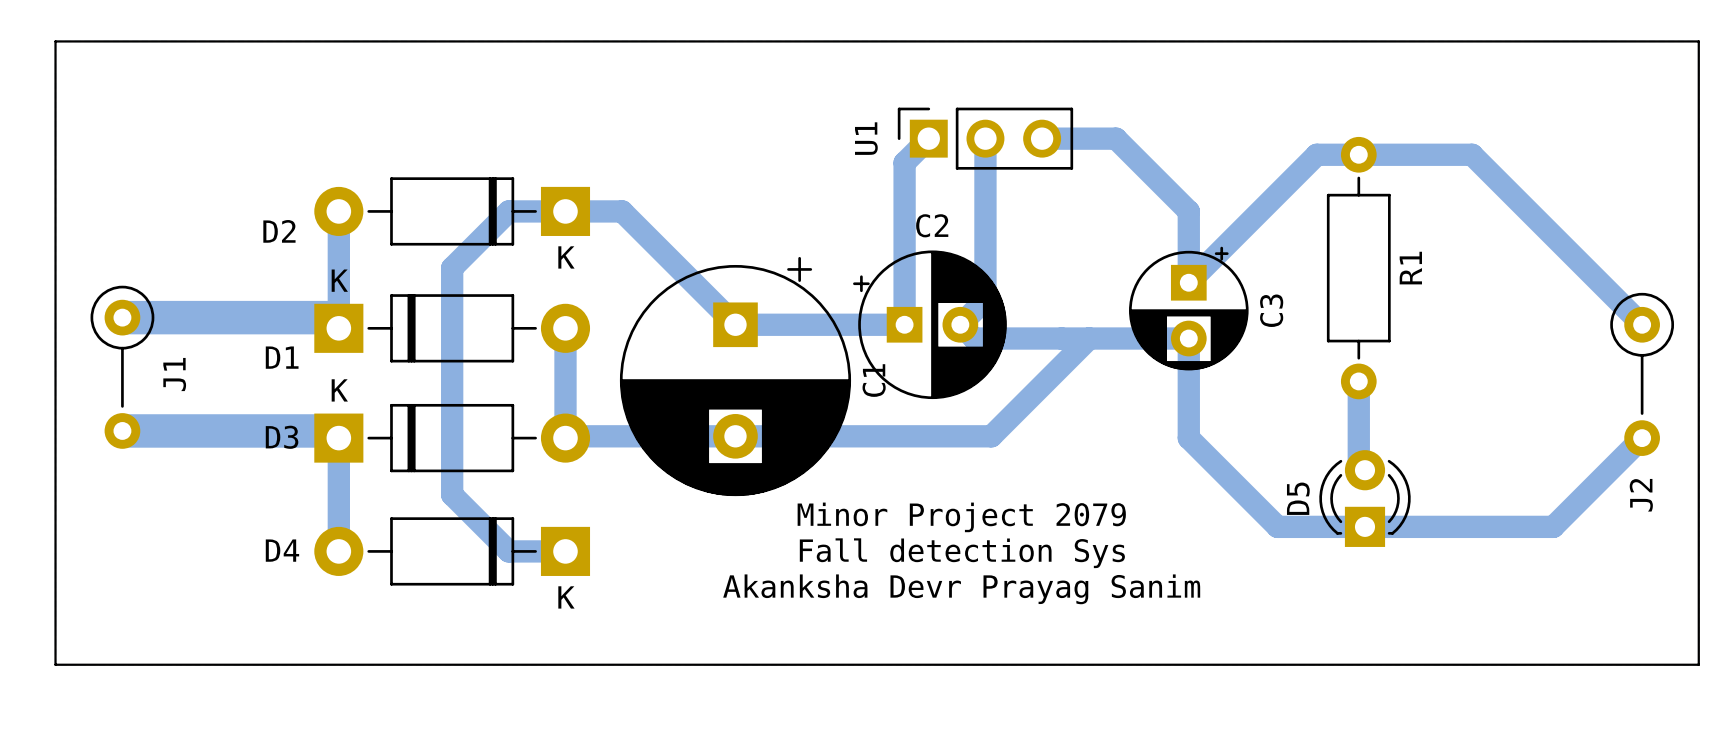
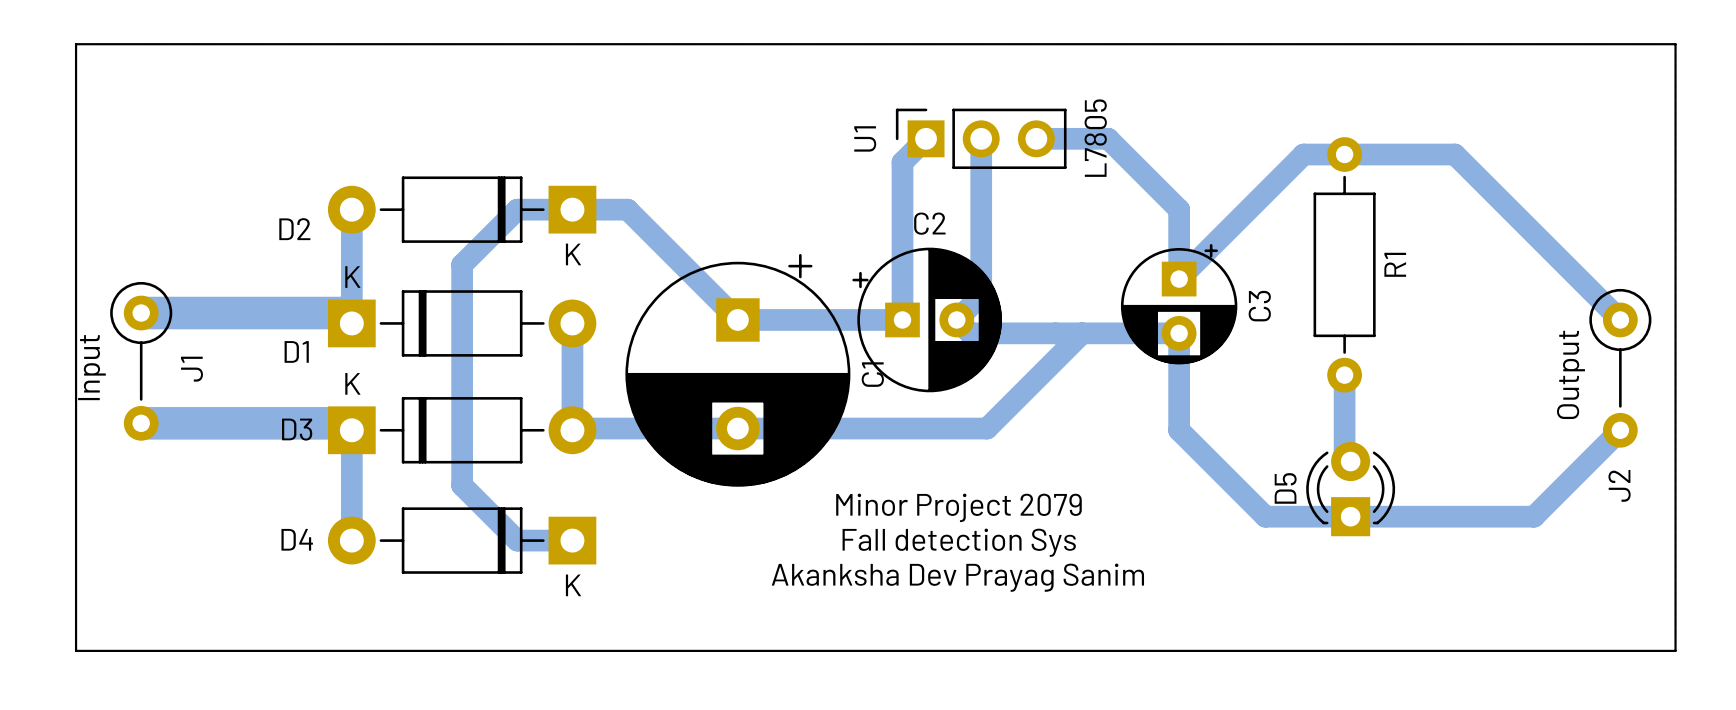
U1 value: none -> L7805 (1095, 138)
J1 value: none -> Input (91, 367)
J2 value: none -> Output (1570, 374)
text: Akanksha Devr Prayag Sanim (961, 589) -> Akanksha Dev Prayag Sanim (957, 577)

